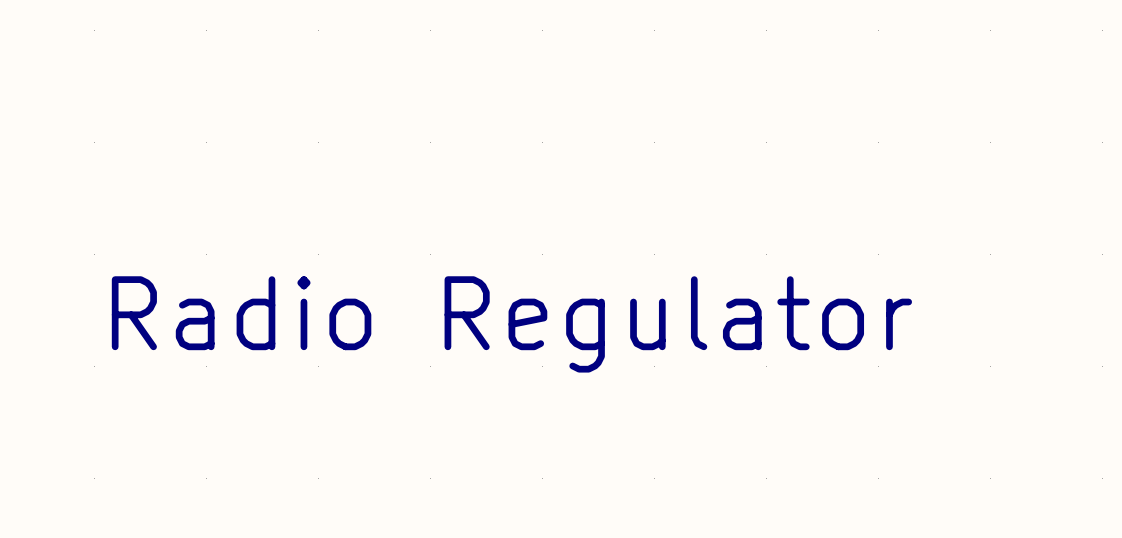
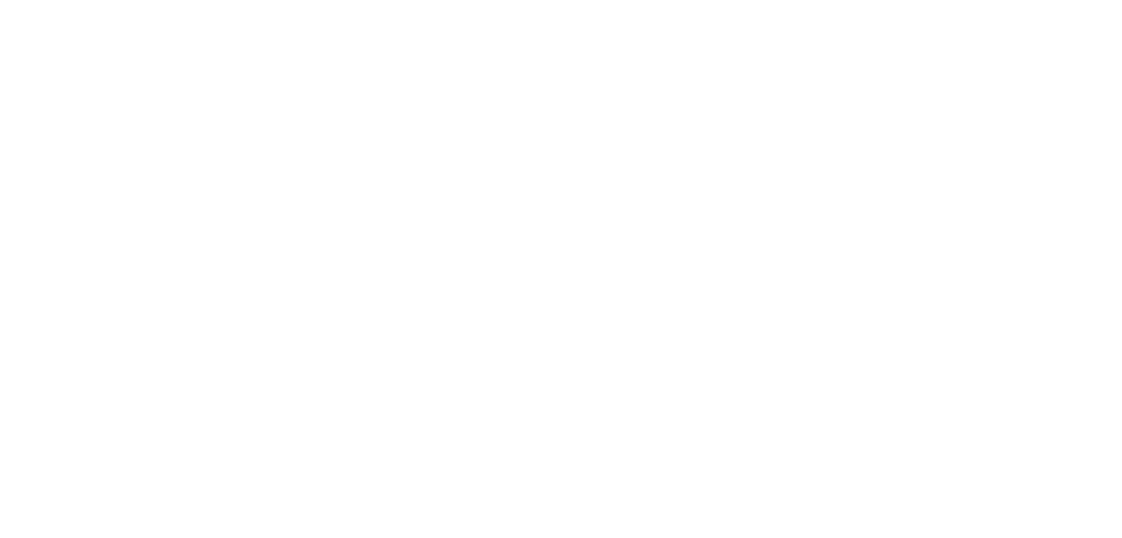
text: Radio Regulator (511, 324) -> none

